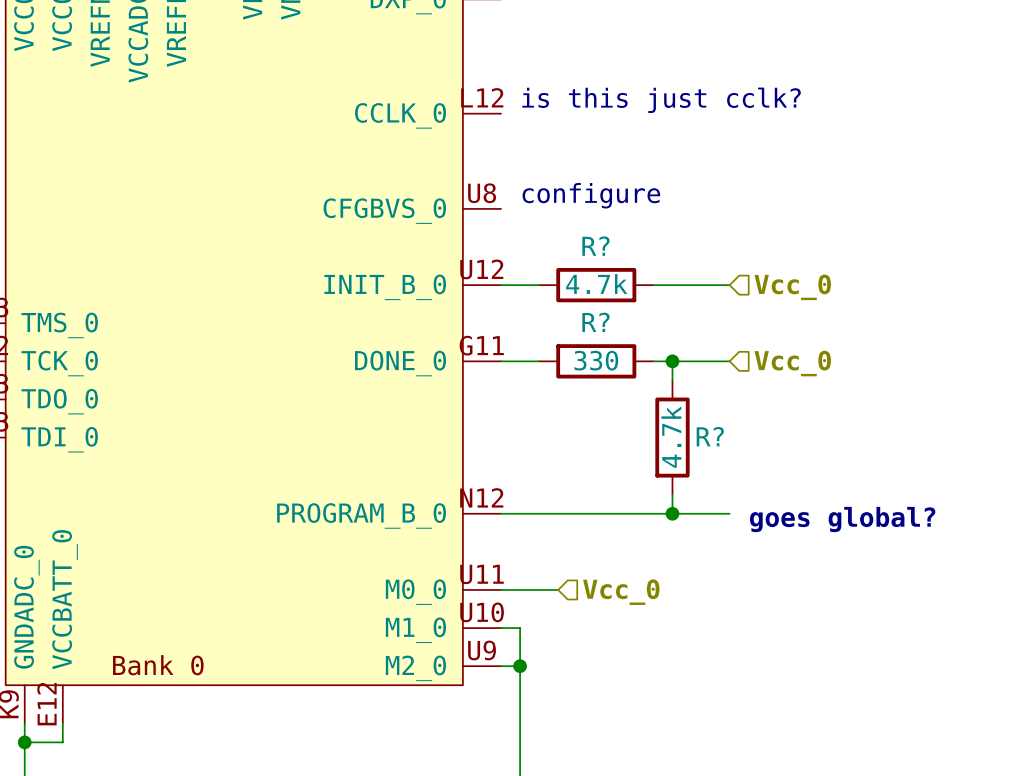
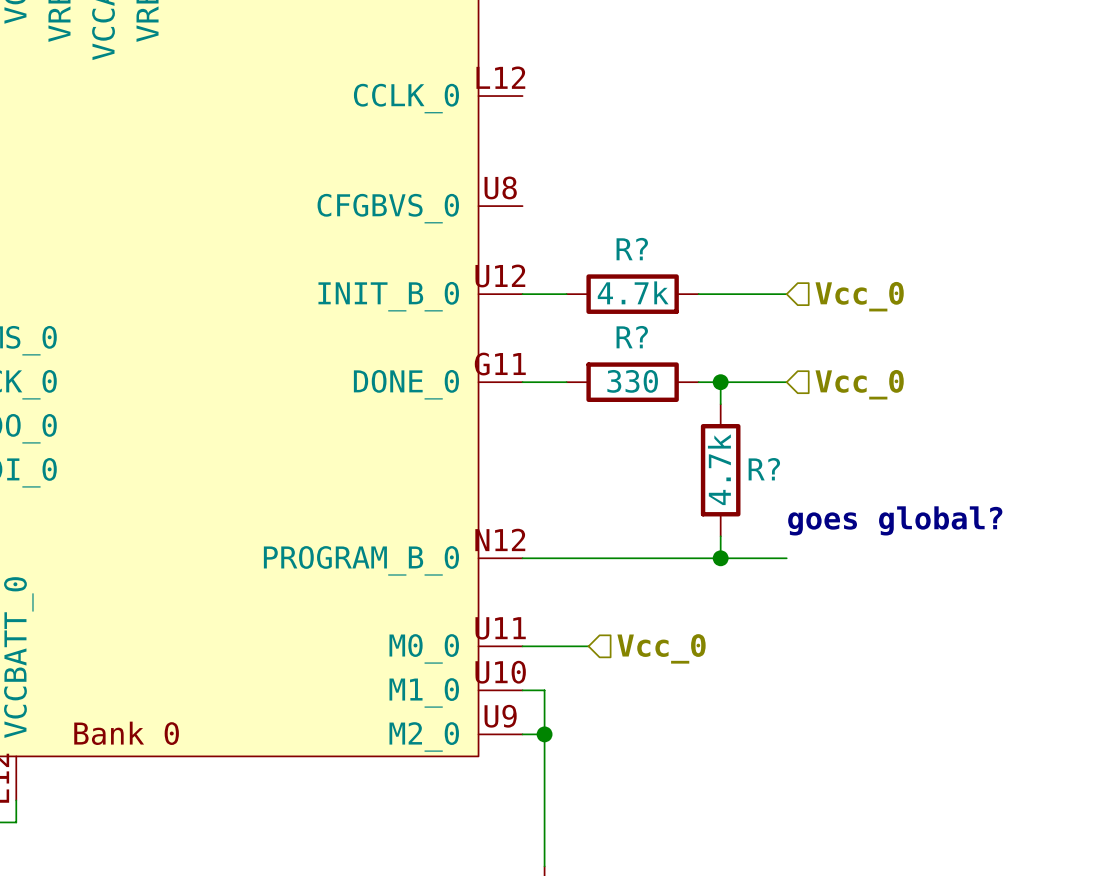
text: is this just cclk? (661, 100) -> none
text: configure (591, 195) -> none
text position: goes global? (842, 519) -> goes global? (895, 520)

